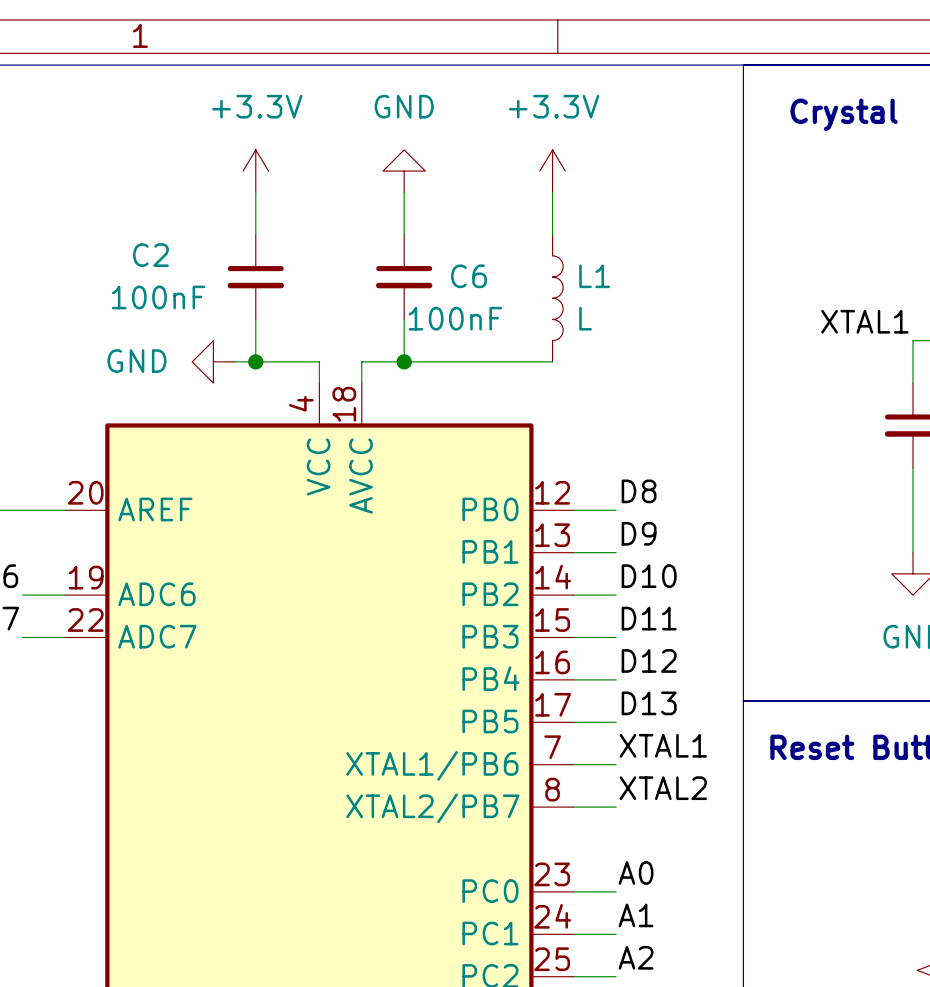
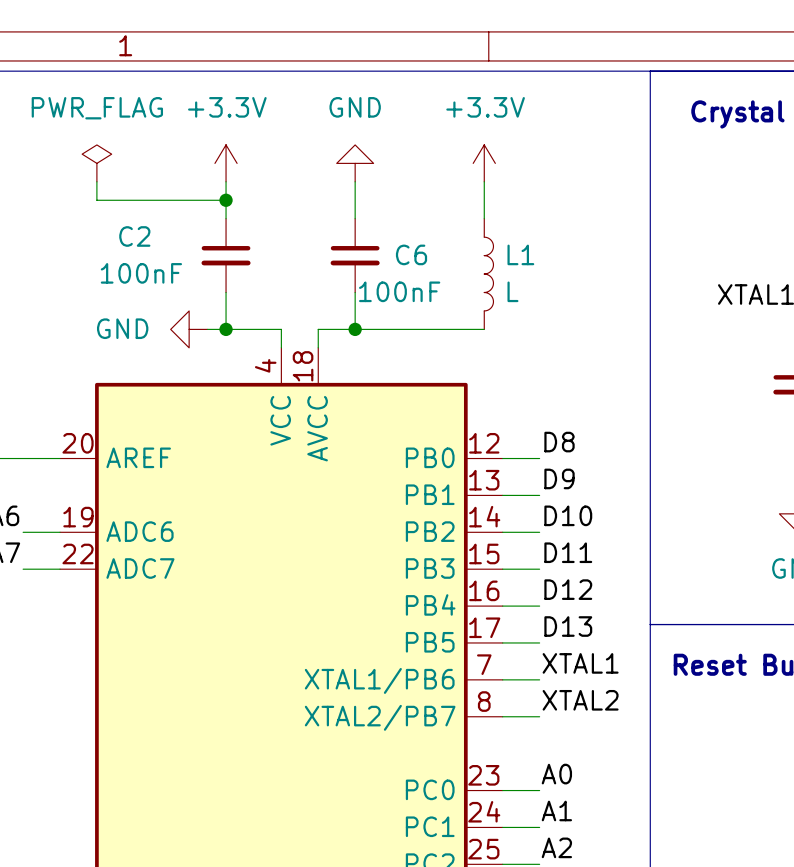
power symbol: none -> PWR_FLAG (96, 163)
wire: none -> (96, 181) (96, 200) (226, 200)
junction: none -> (226, 200)

